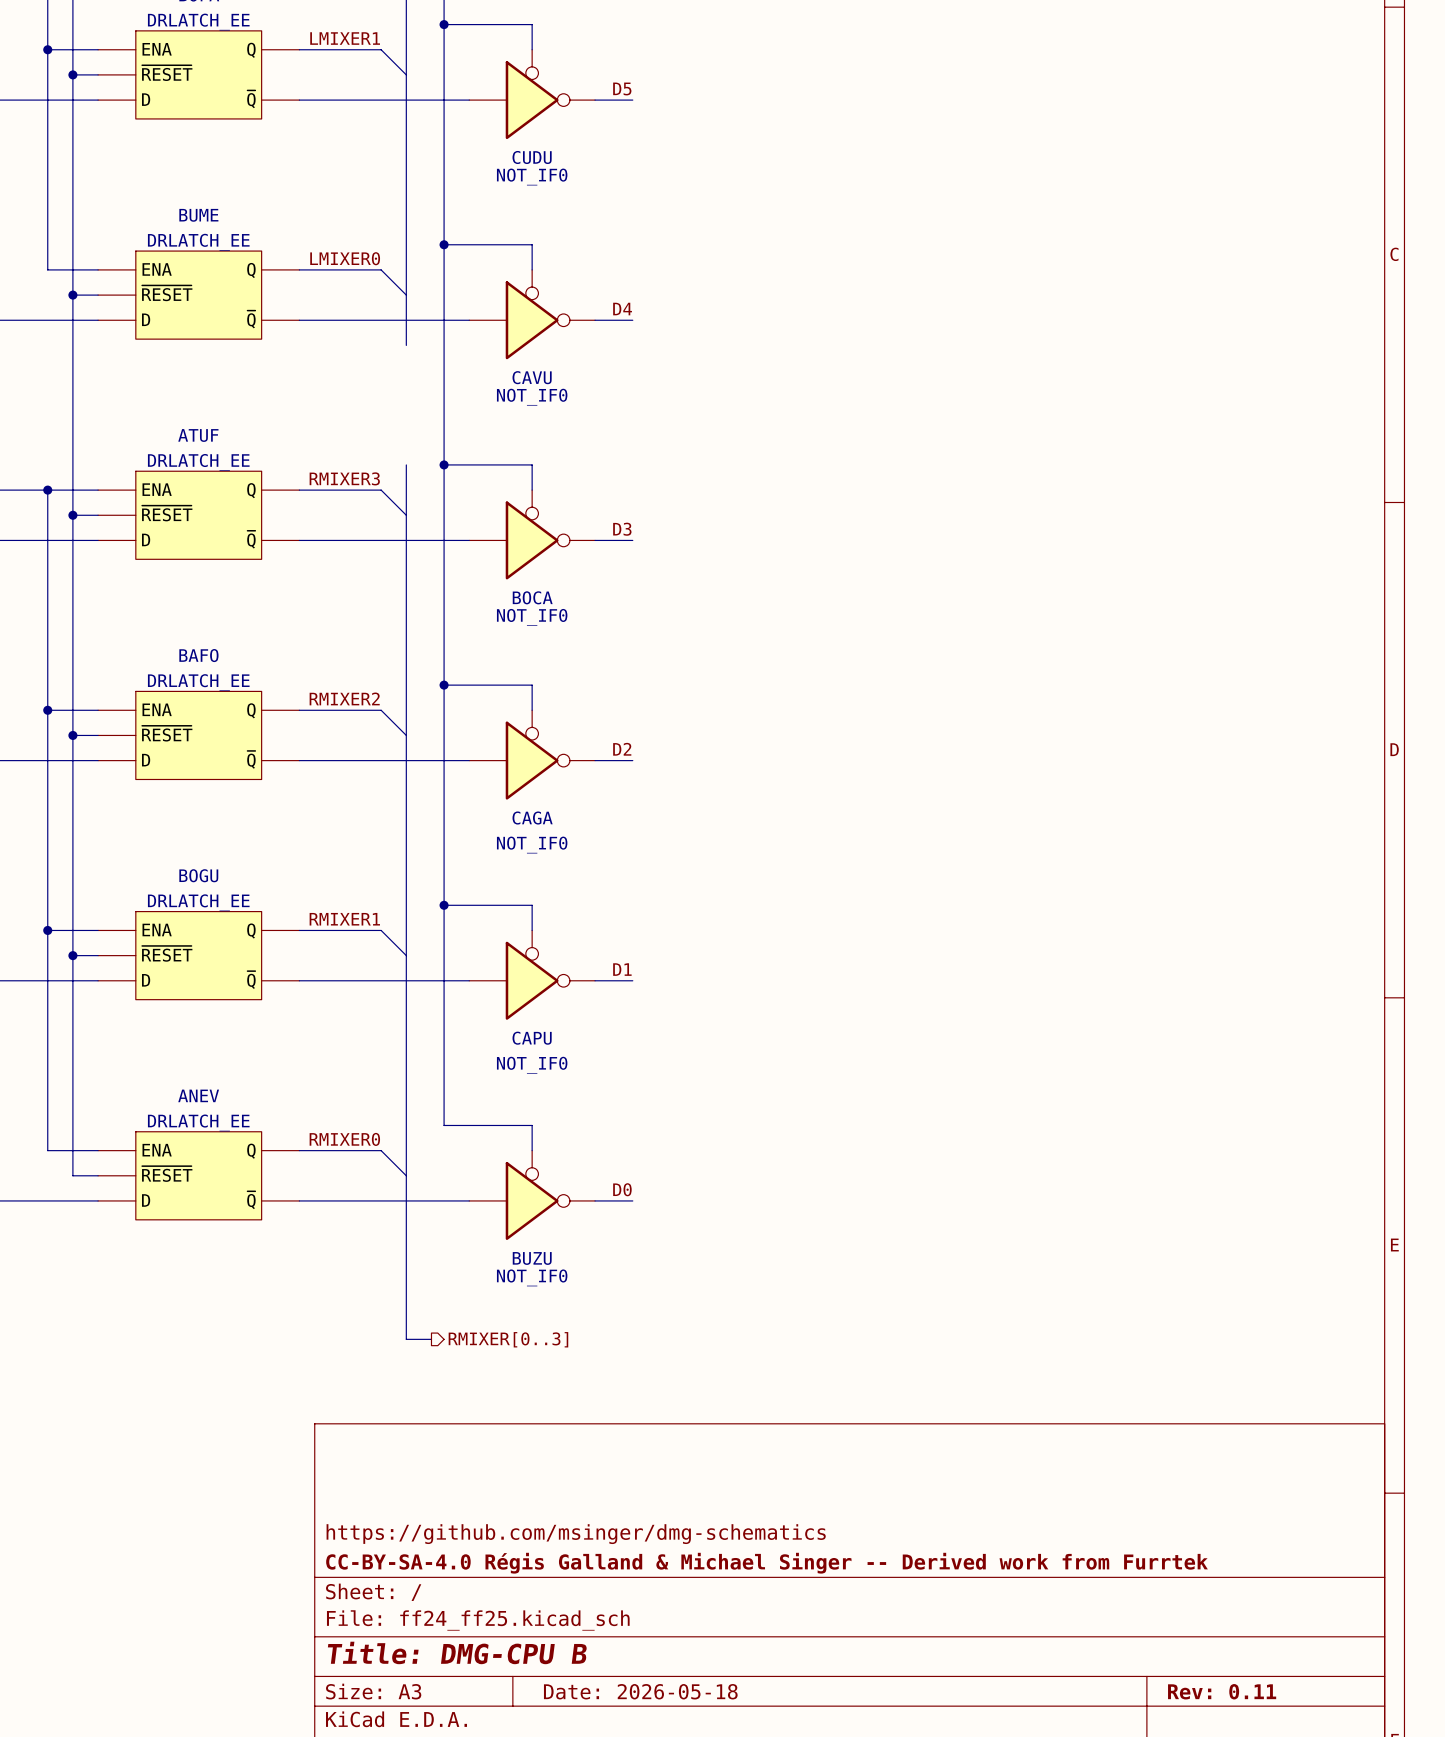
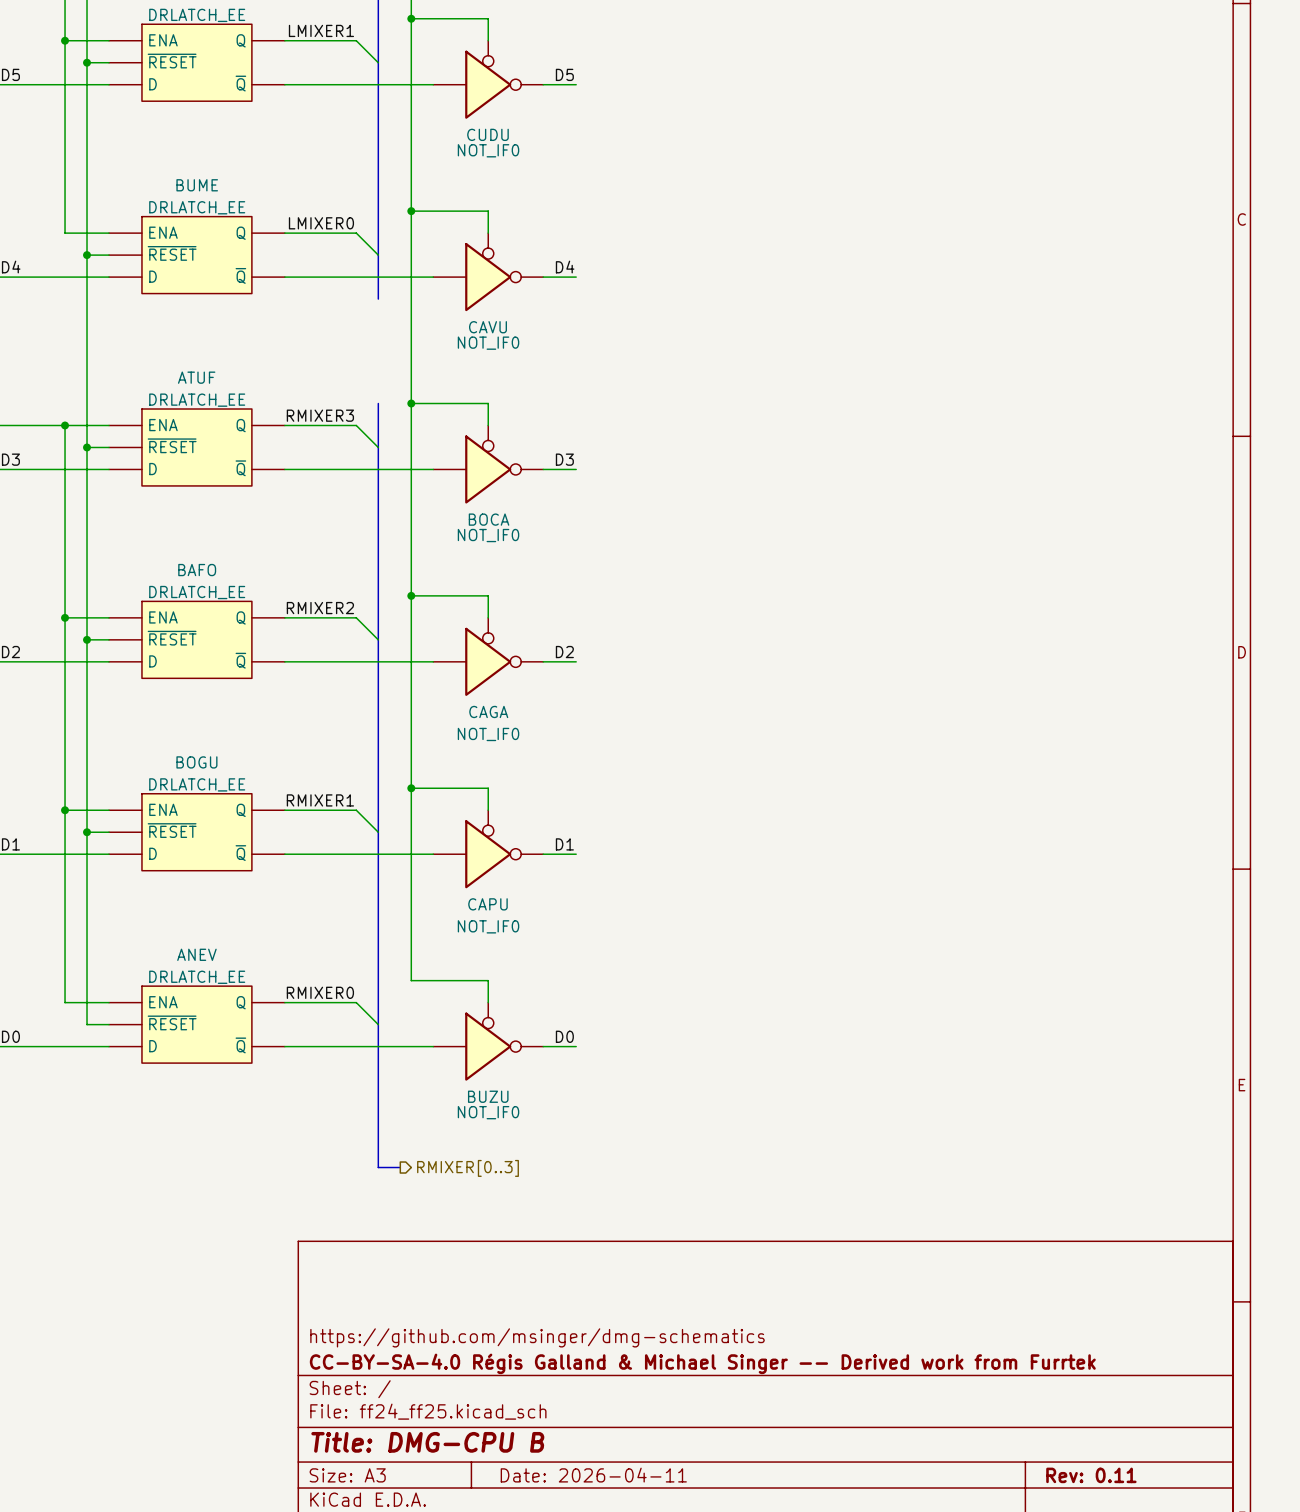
title block: Date: 2026-05-18 (640, 1691) -> Date: 2026-04-11 (593, 1475)

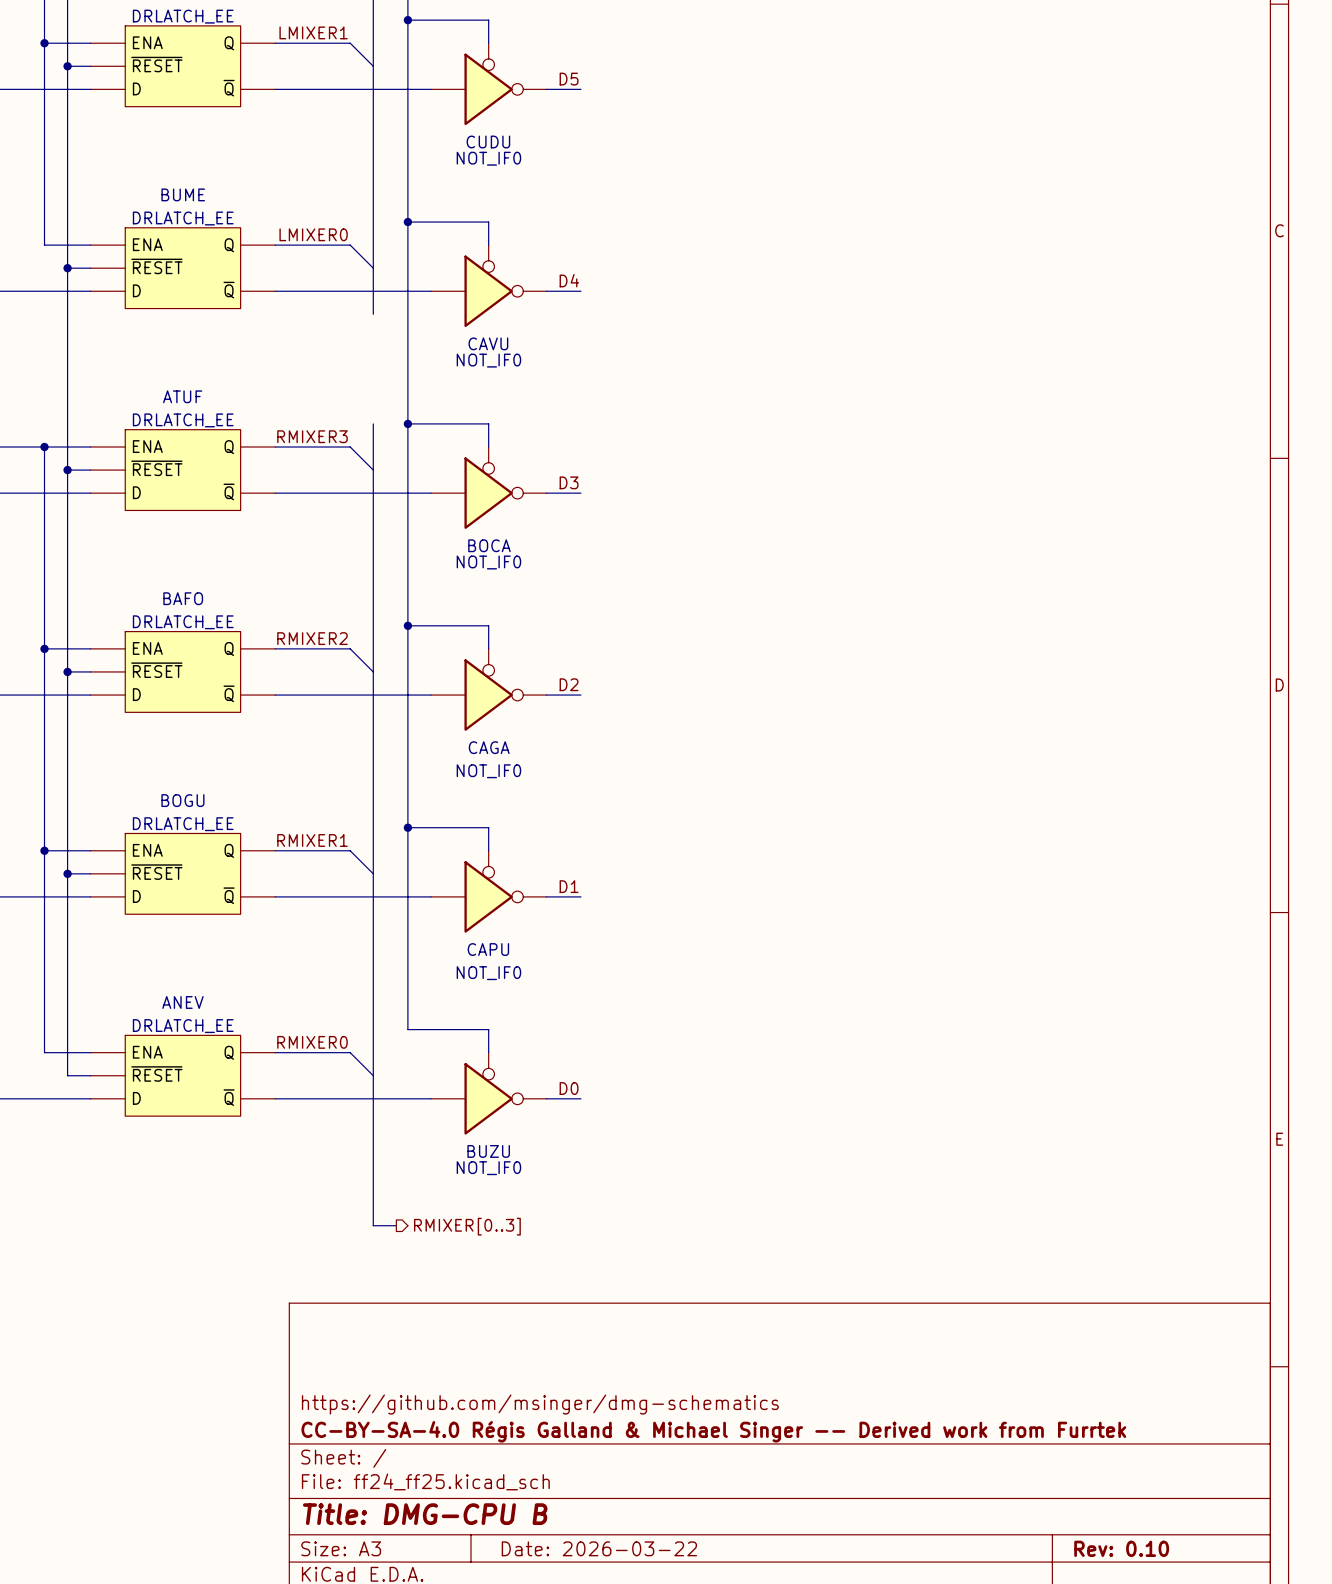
title block: Date: 2026-04-11 (593, 1475) -> Date: 2026-03-22 (599, 1548)
title block: Rev: 0.11 (1091, 1475) -> Rev: 0.10 (1121, 1548)

